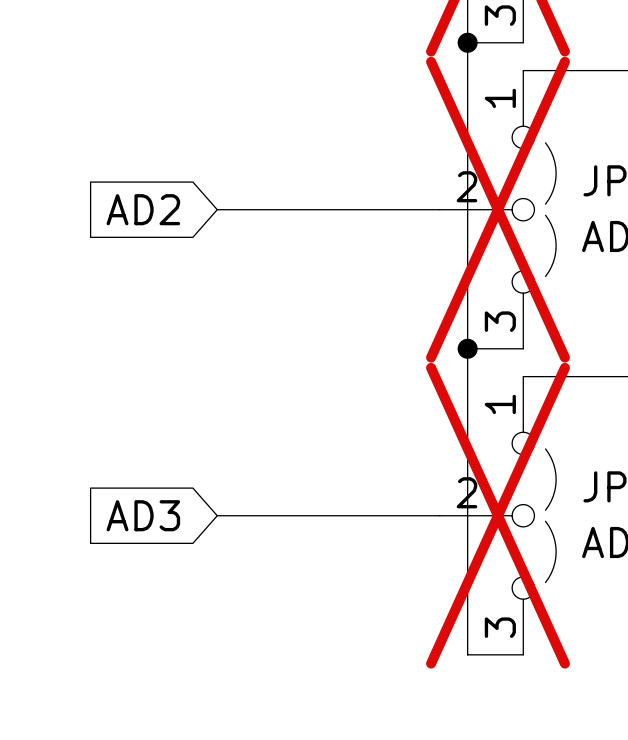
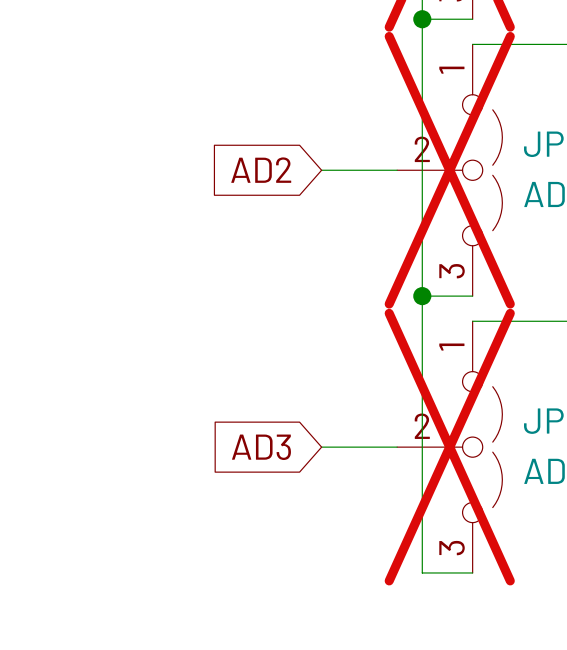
global label position: AD2 (143, 209) -> AD2 (261, 170)
wire: (217, 209) (356, 209) -> none
global label position: AD3 (143, 515) -> AD3 (261, 447)
wire: (217, 515) (356, 515) -> none

